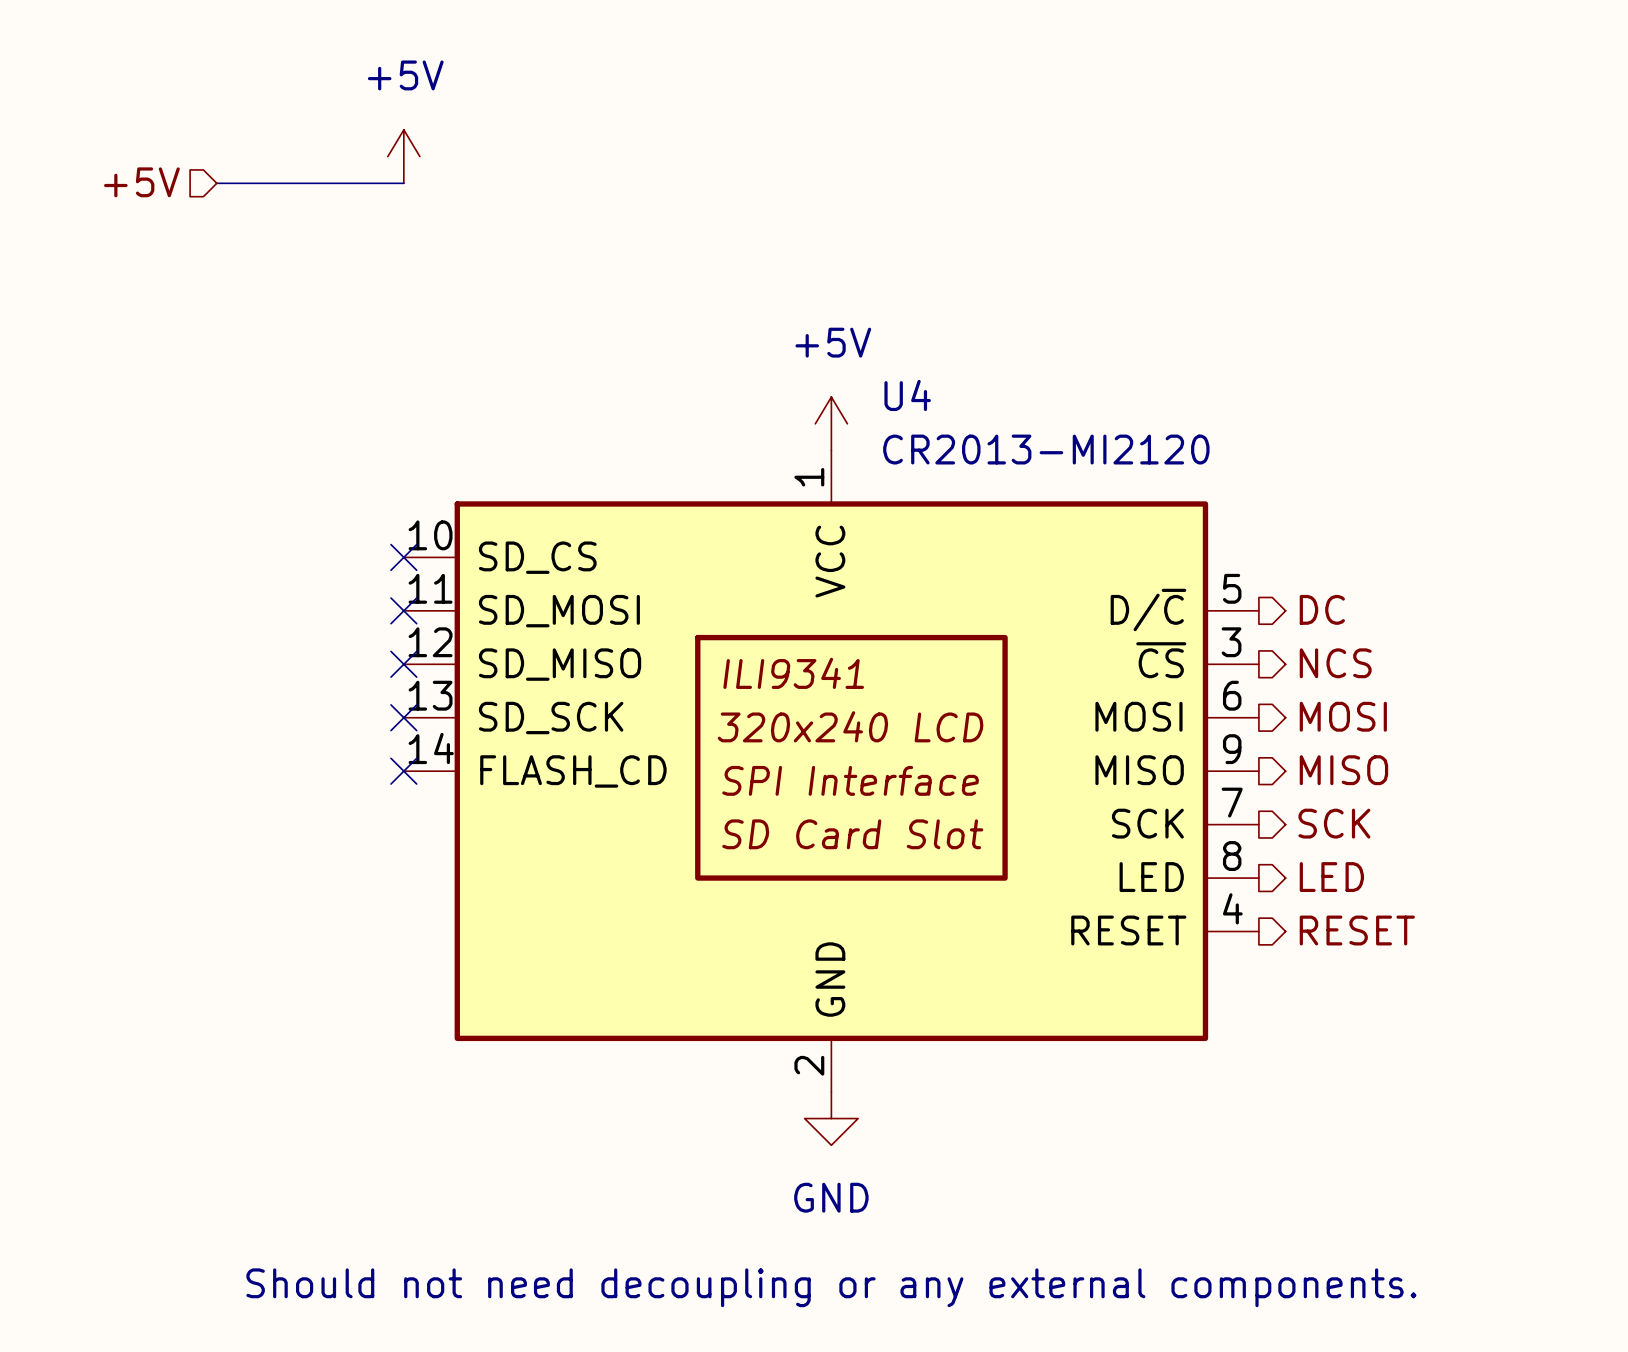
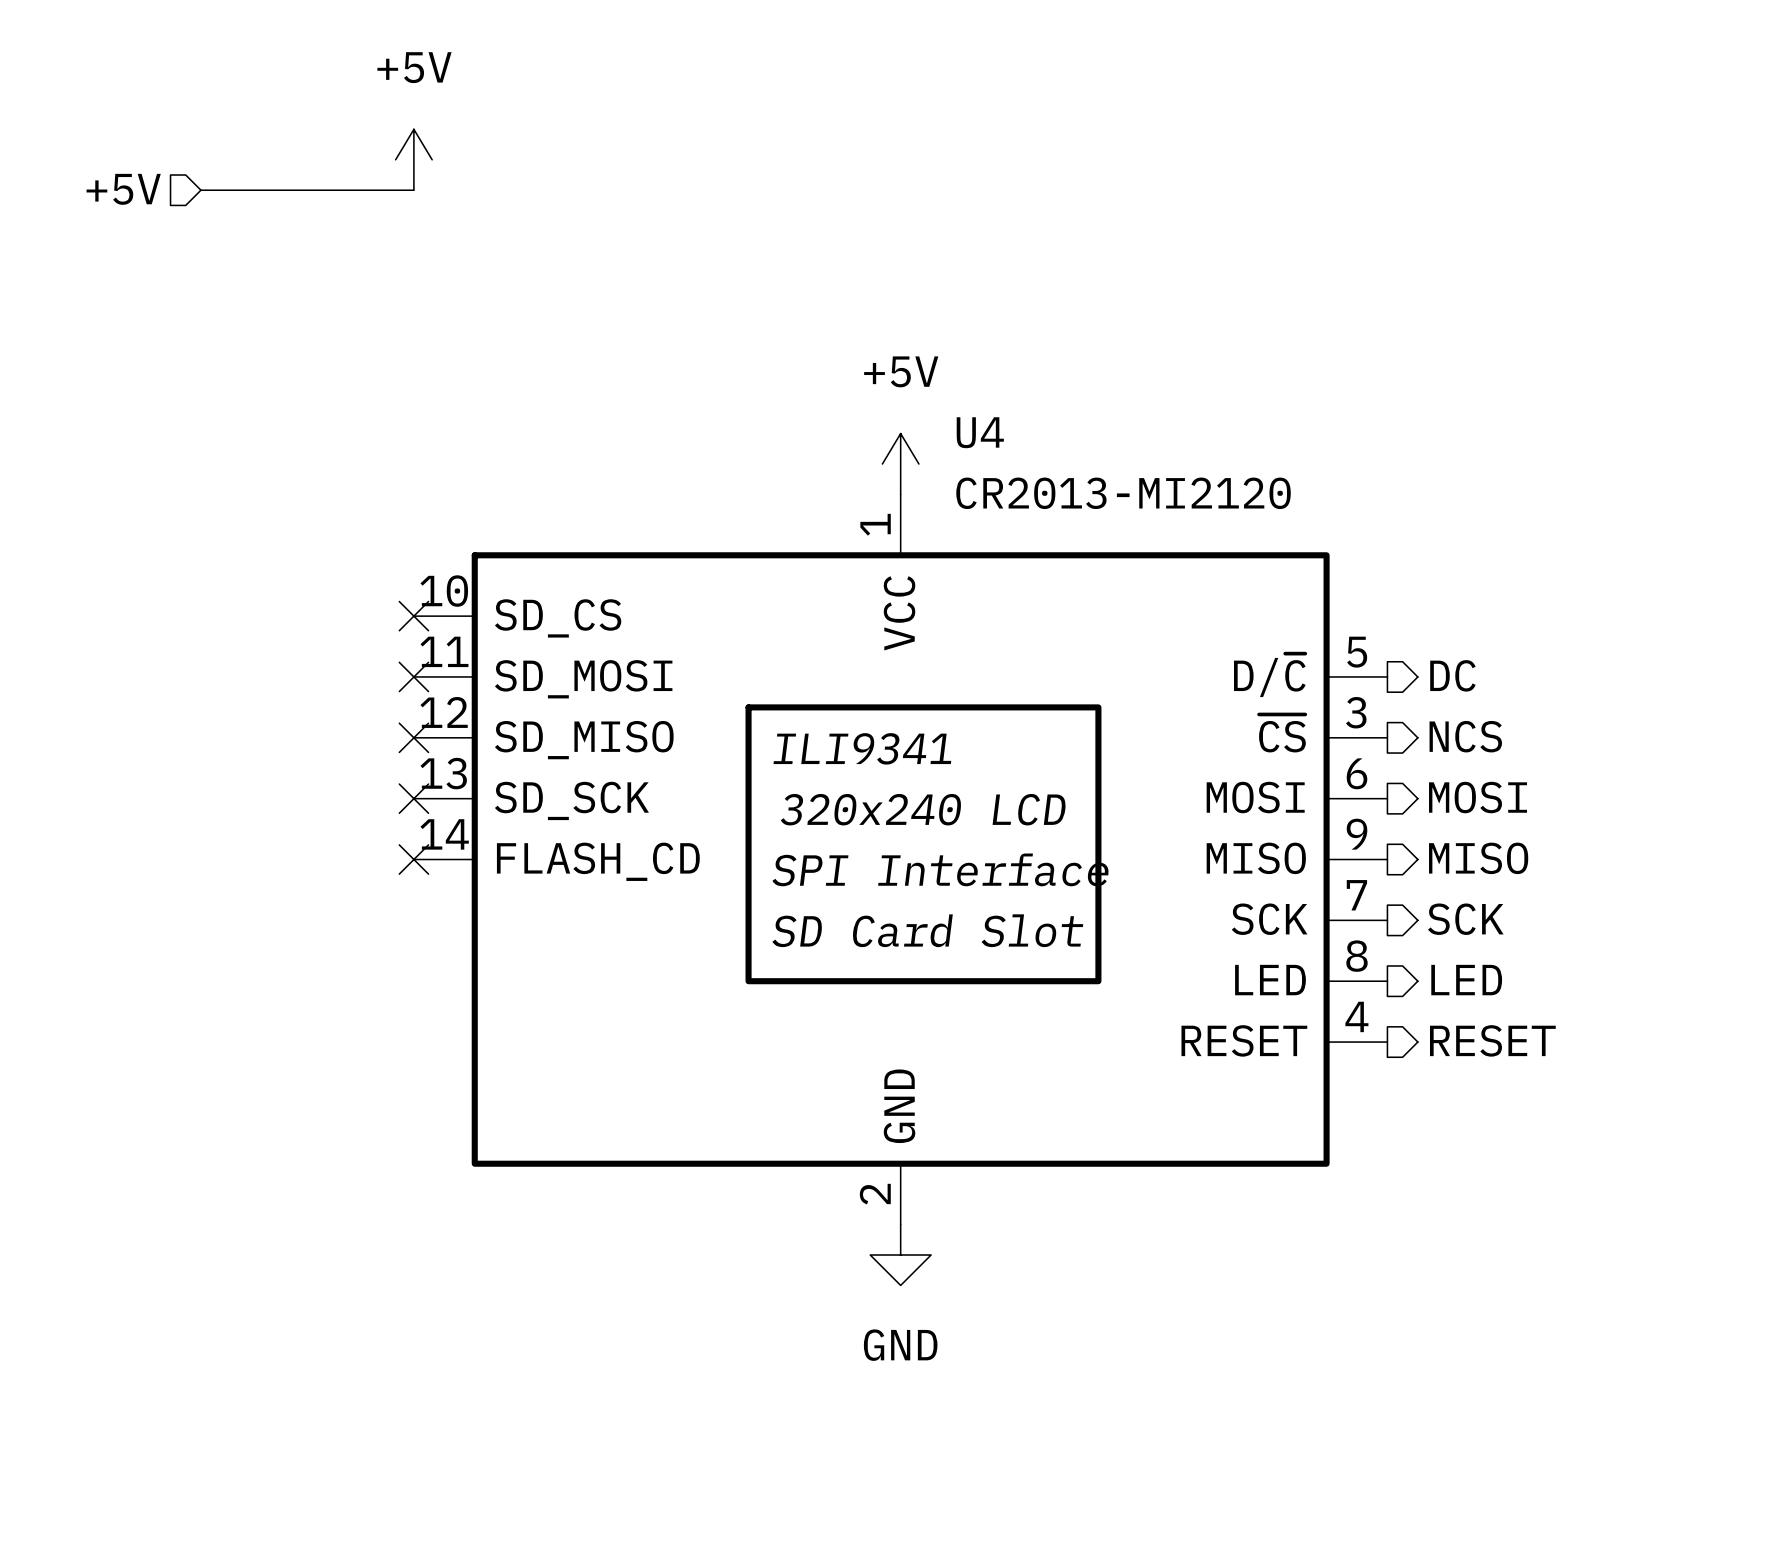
text: Should not need decoupling or any external components. (831, 1287) -> none

